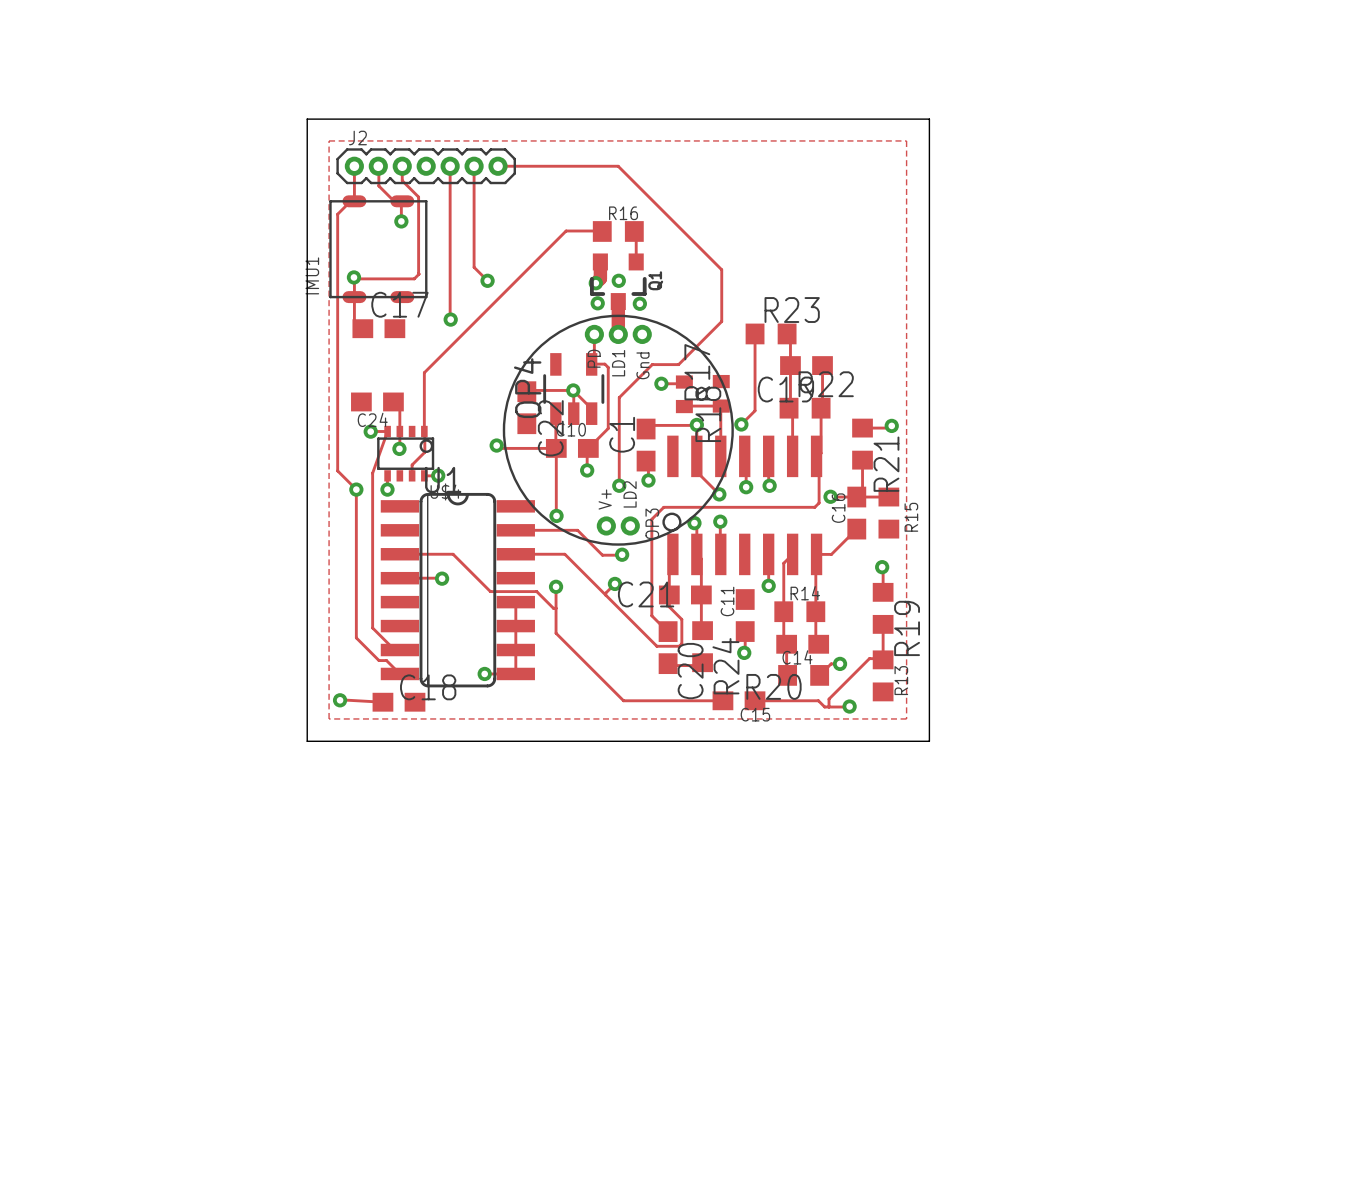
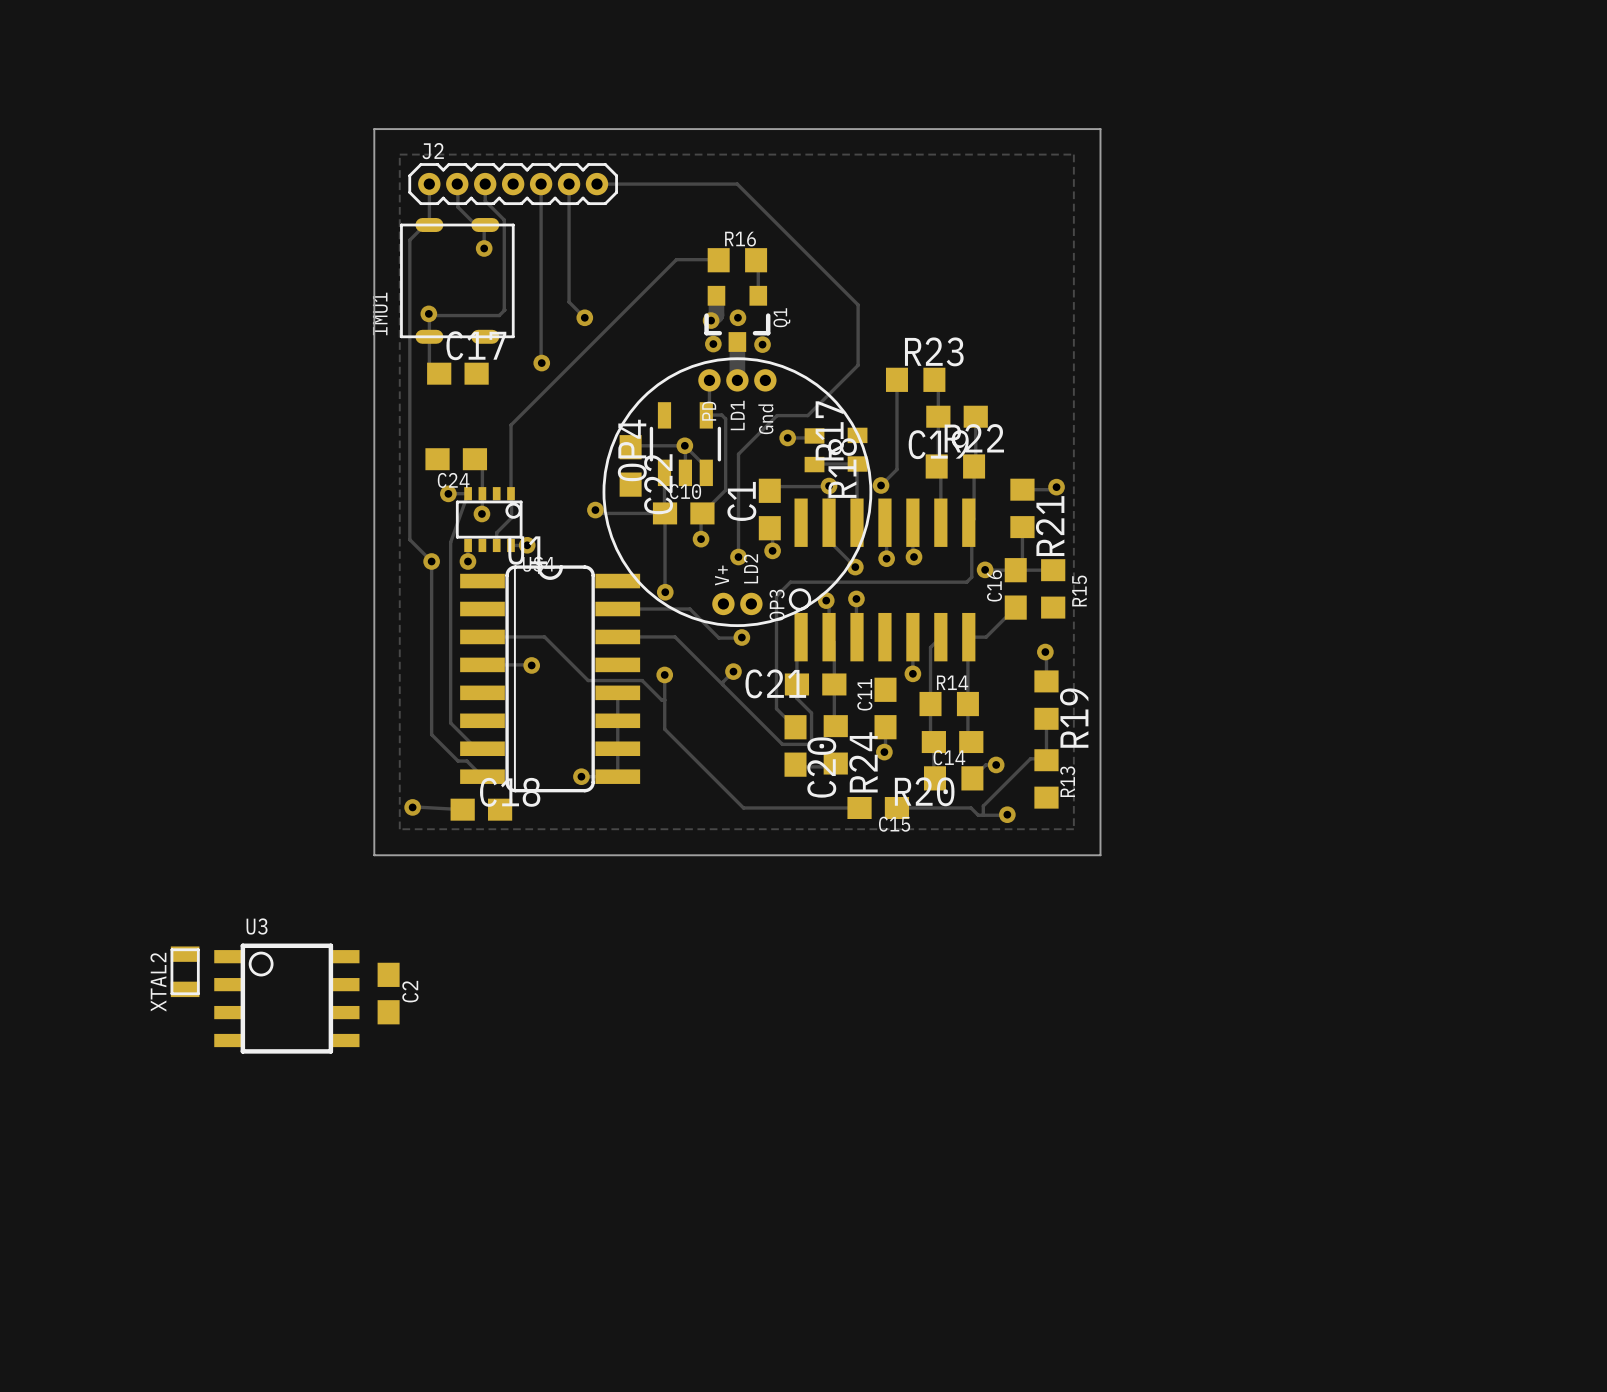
XTAL2: none -> (185, 971)
C2: none -> (388, 993)
U3: none -> (286, 998)

